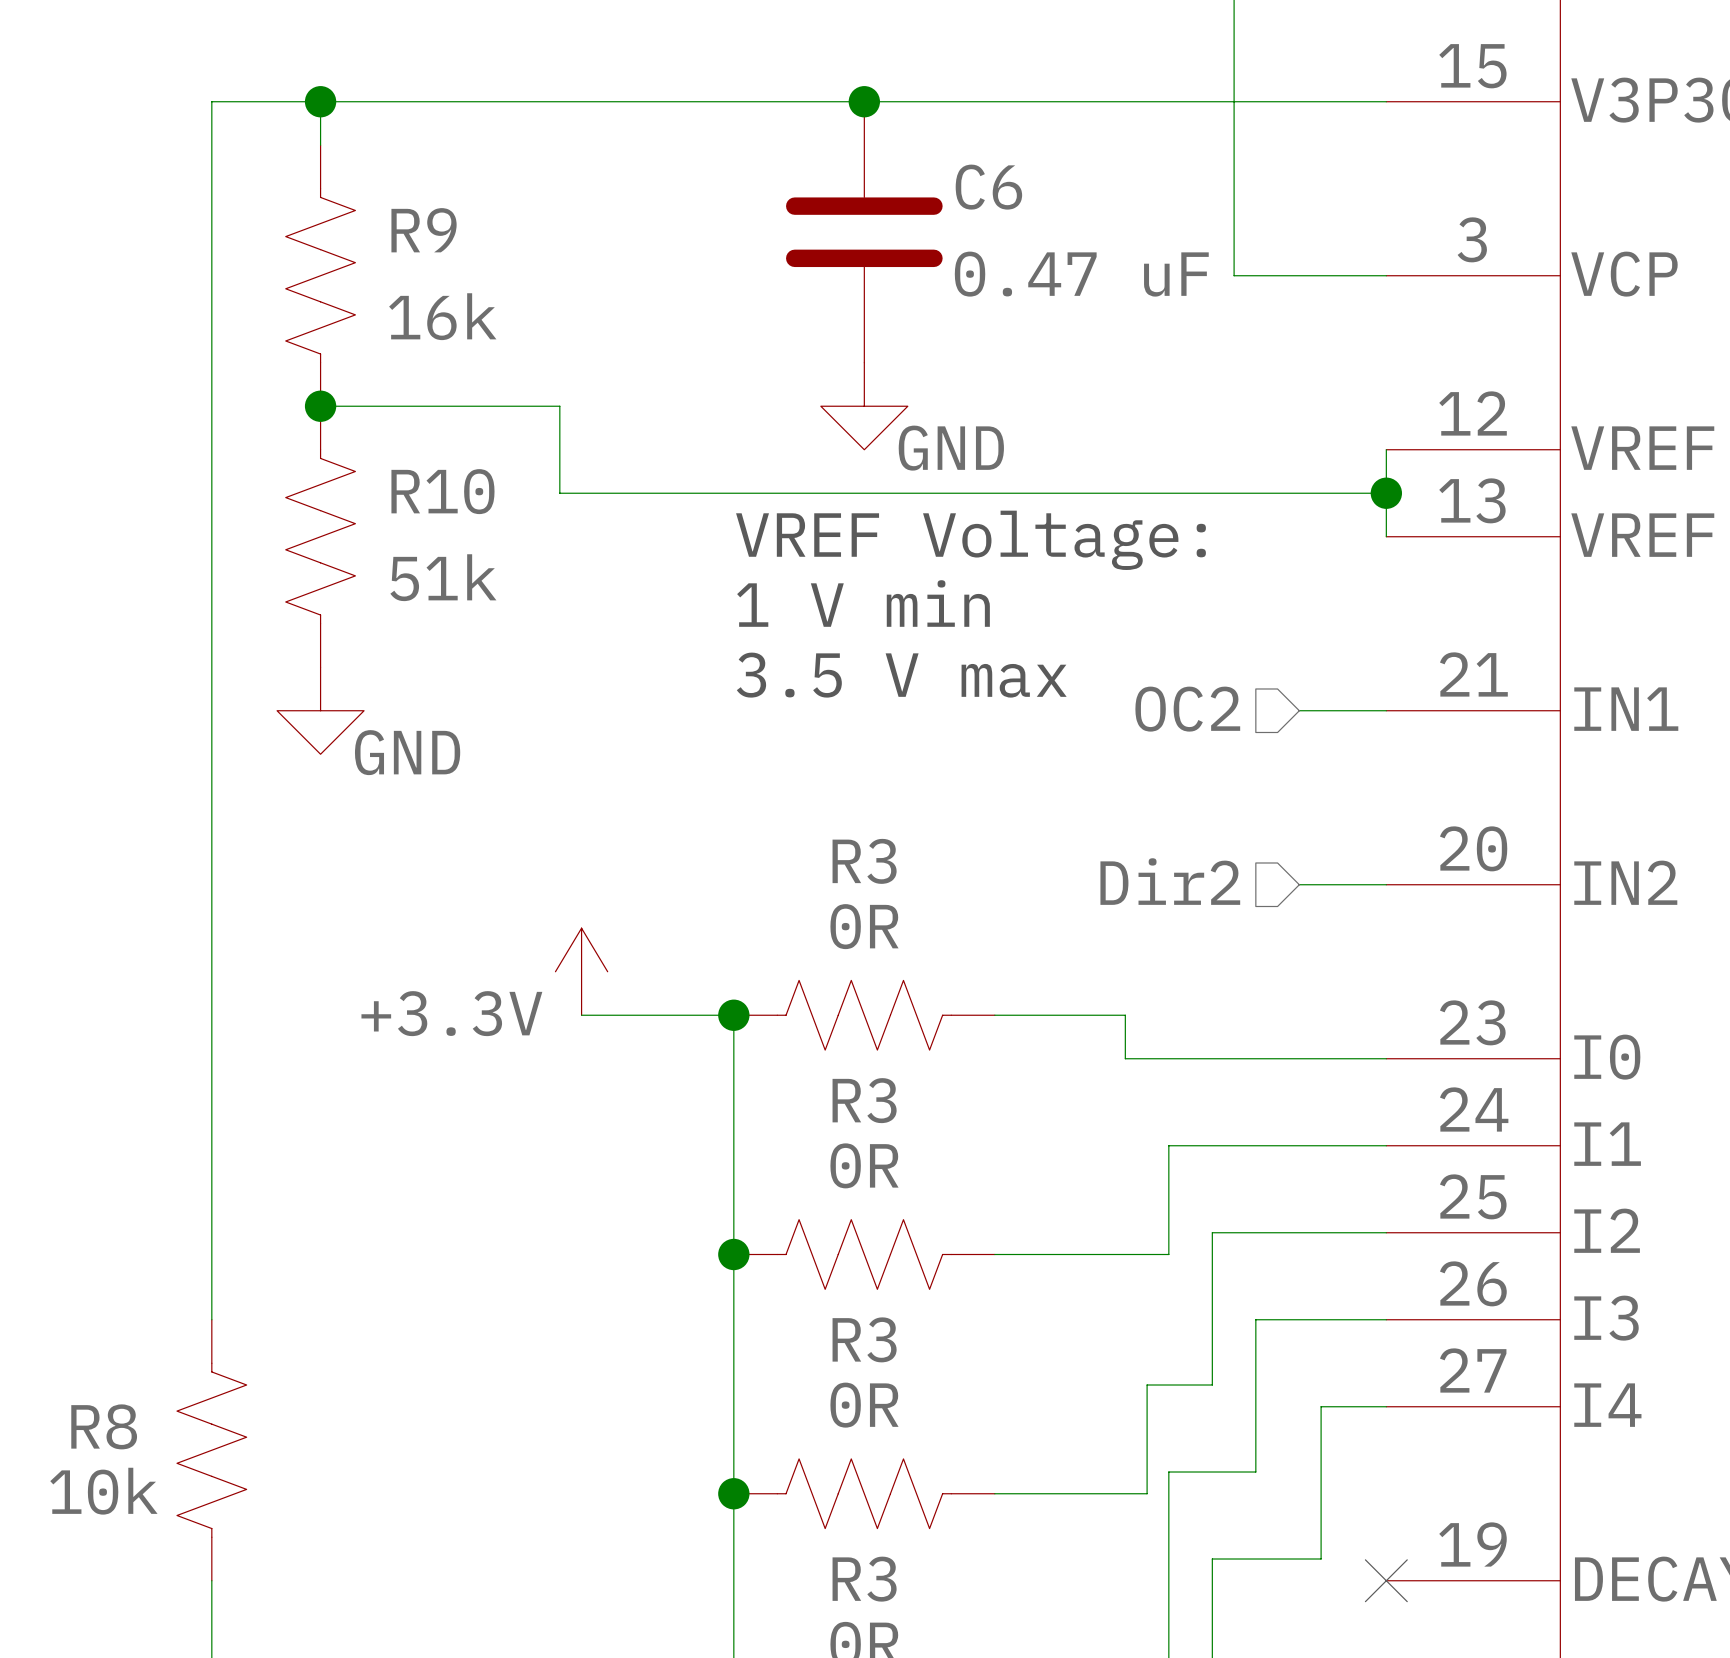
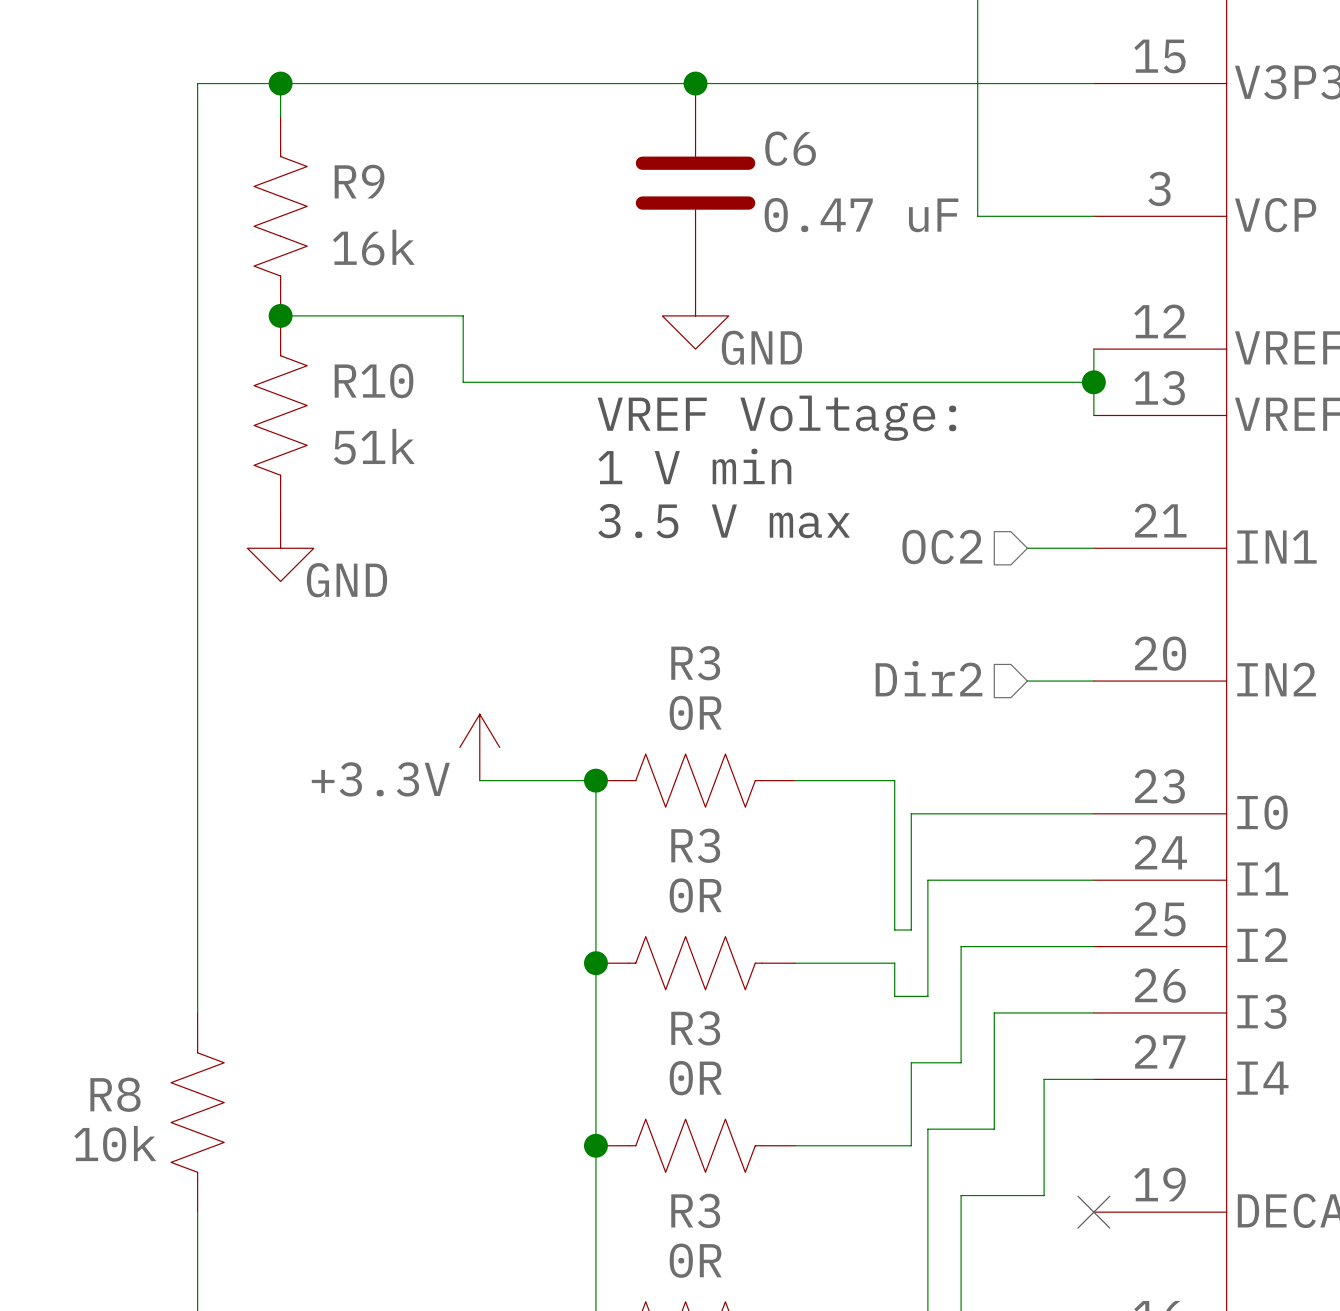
wire: (1125, 1058) (1147, 1058) -> (894, 813) (894, 930) (911, 930) (911, 813)
wire: (1125, 1254) (1168, 1254) -> (894, 963) (894, 996) (927, 996) (927, 963)

